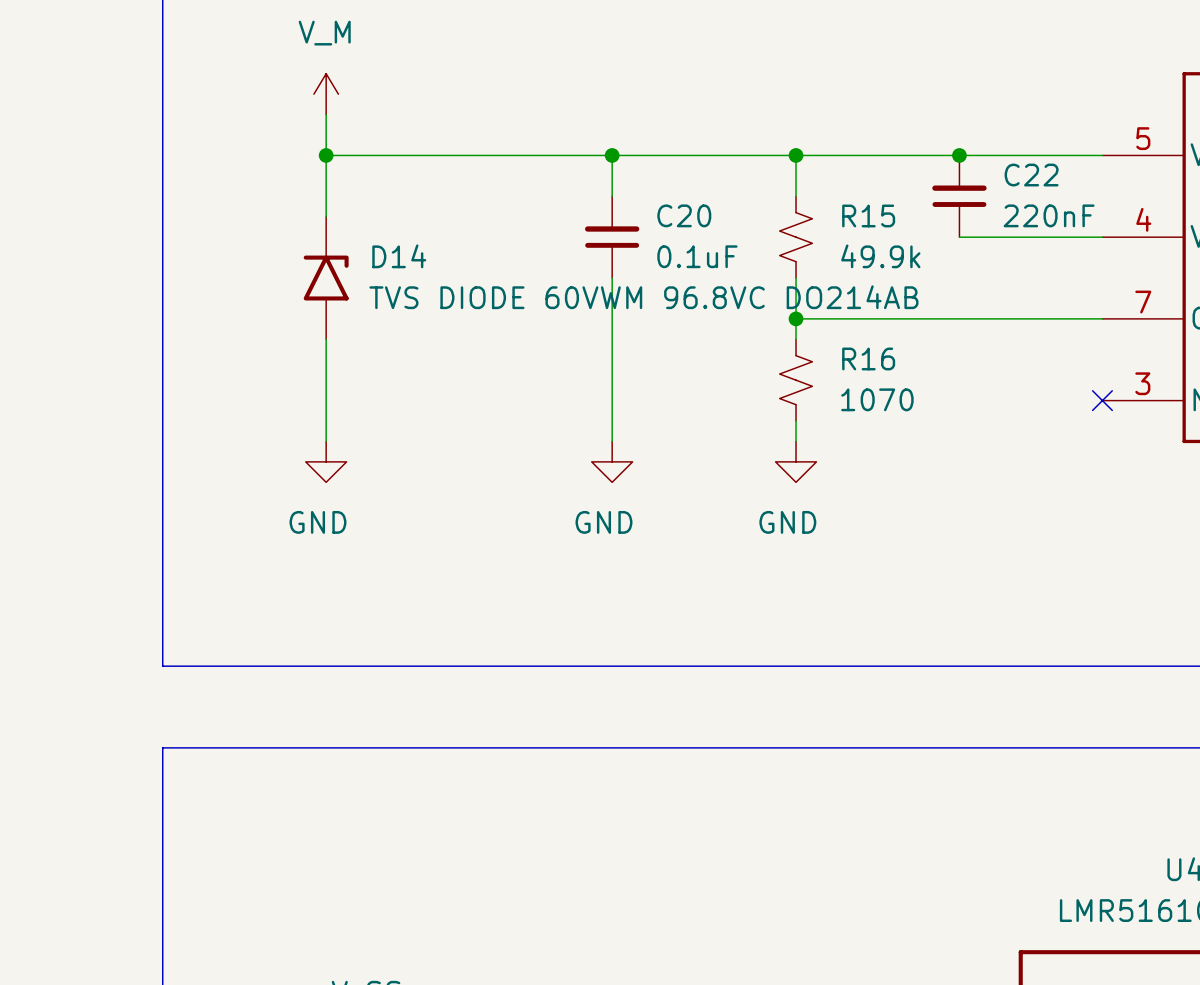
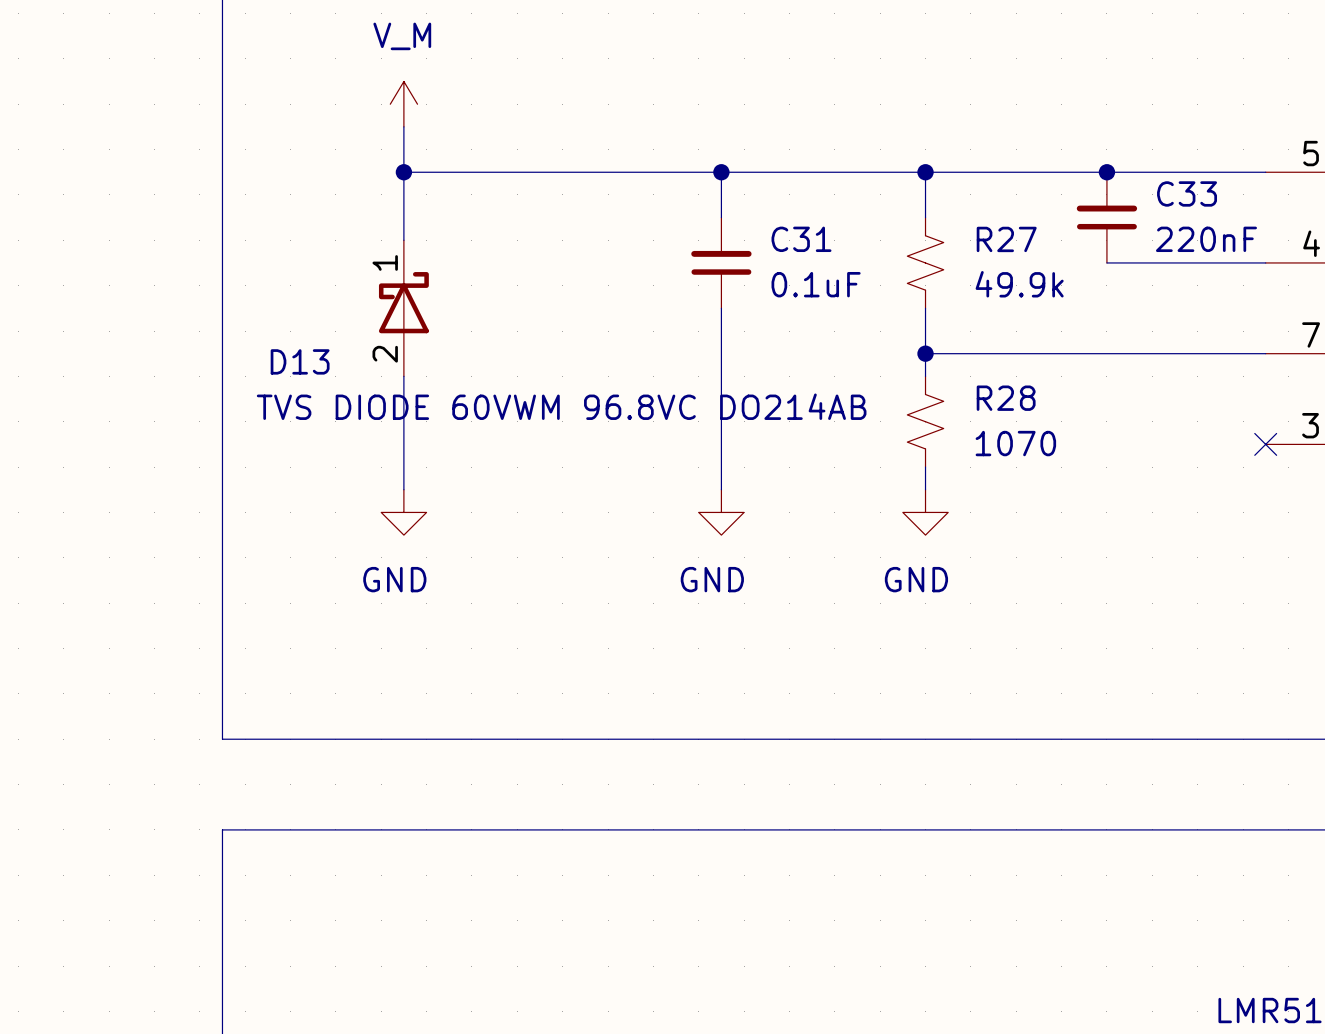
C22 name: C22 (1031, 175) -> C33 (1187, 193)
C20 name: C20 (684, 215) -> C31 (801, 239)
R15 name: R15 (868, 215) -> R27 (1006, 239)
D14: TVS DIODE 60VWM 96.8VC DO214AB (326, 278) -> none
D13: none -> TVS DIODE 60VWM 96.8VC DO214AB (403, 308)
R16 name: R16 (868, 358) -> R28 (1006, 398)

